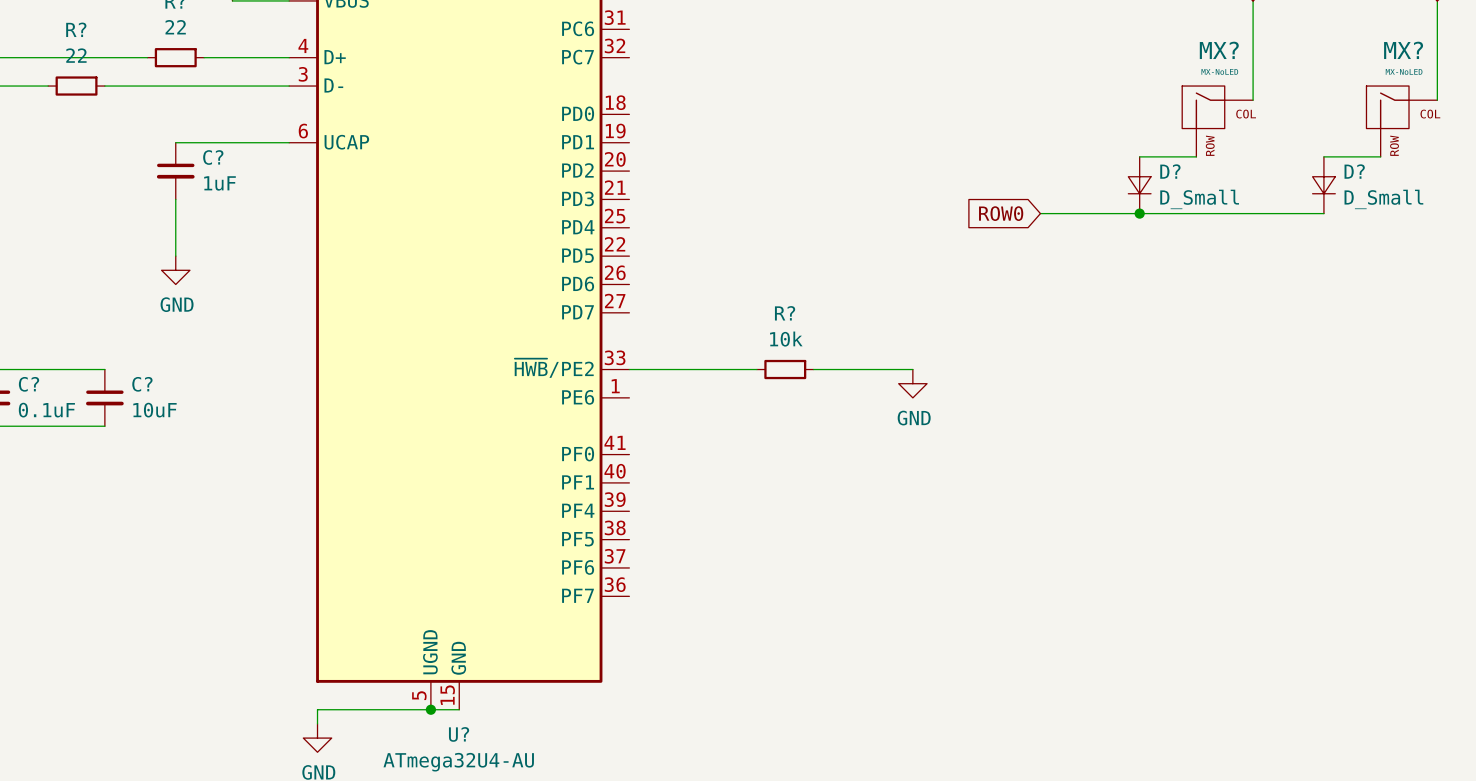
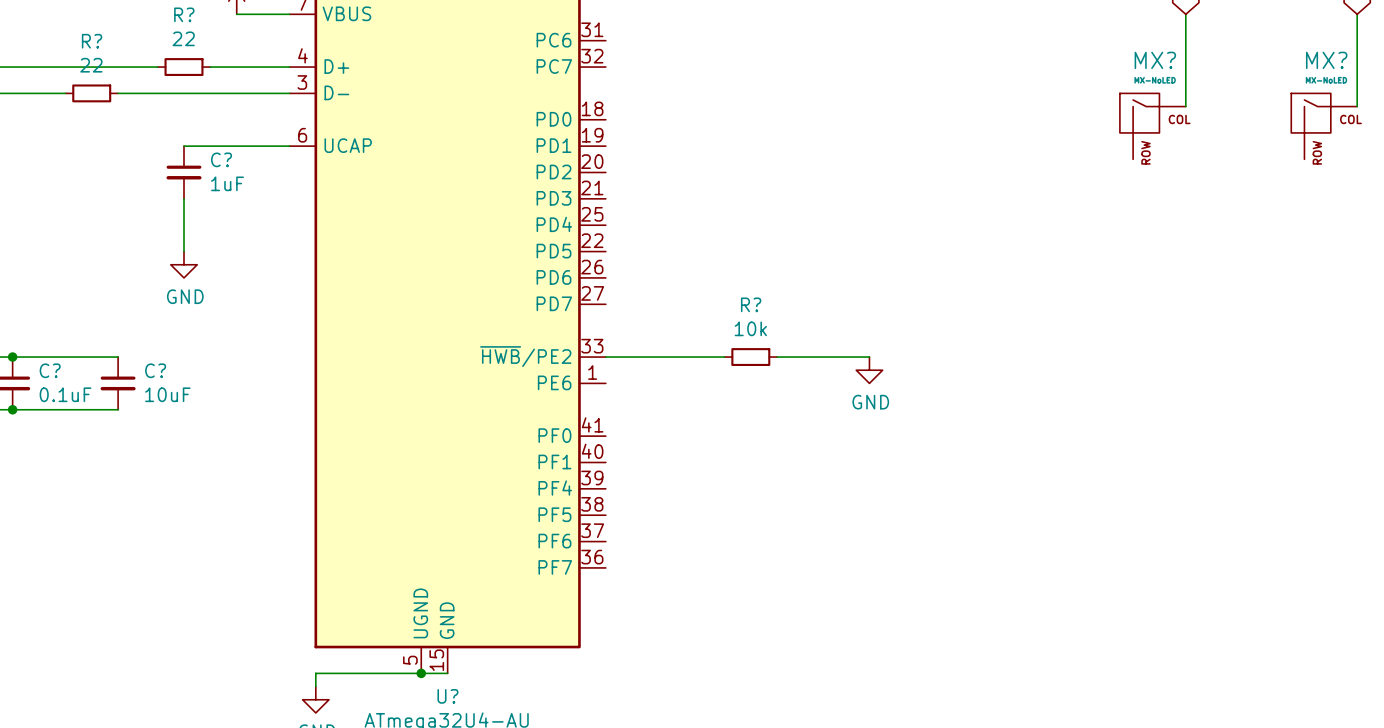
wire: (1139, 156) (1196, 156) -> none
wire: (1323, 156) (1380, 156) -> none
D?: D_Small (1139, 185) -> none
D?: D_Small (1323, 185) -> none
global label: ROW0 (1001, 213) -> none
wire: (1040, 213) (1323, 213) -> none
junction: (1139, 213) -> none

